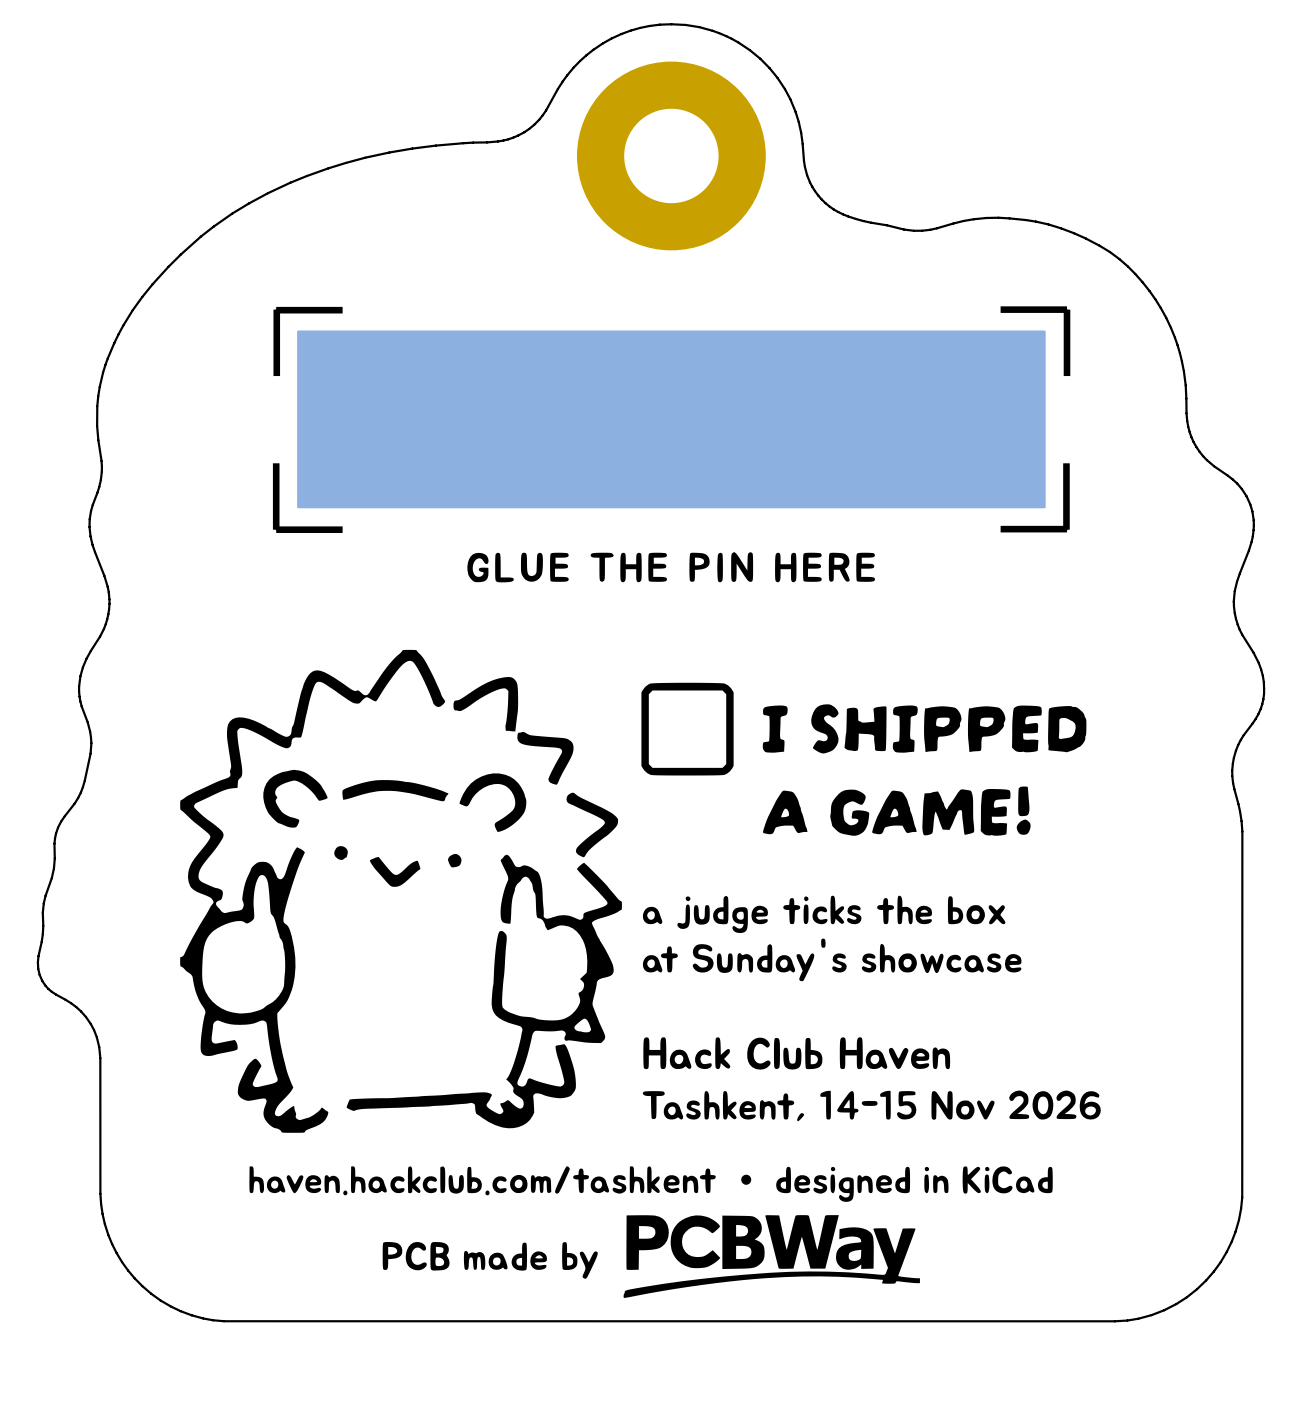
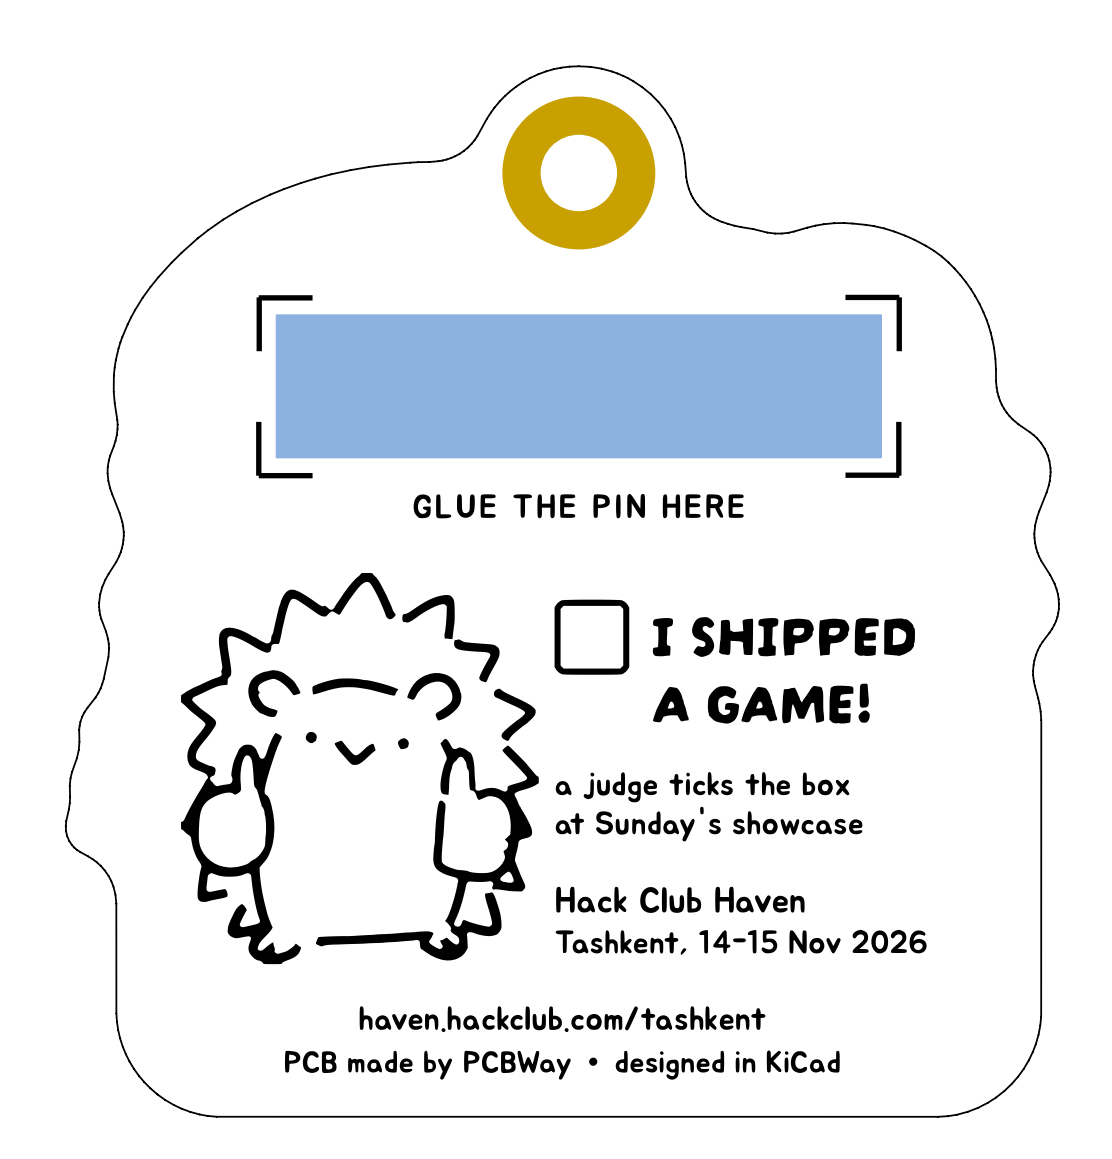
drawing shape: [180, 306, 1101, 1298] -> [181, 294, 927, 1080]

